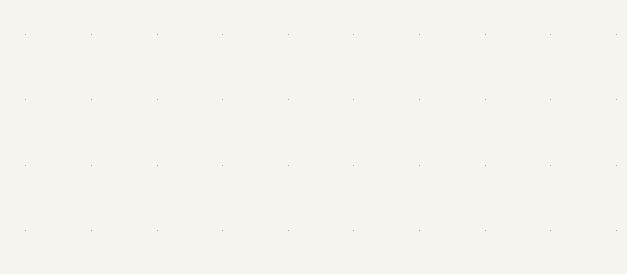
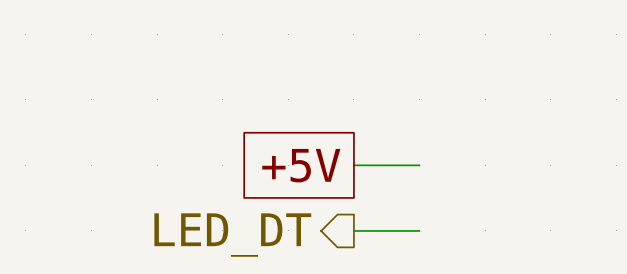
global label: none -> +5V (301, 165)
wire: none -> (353, 165) (419, 165)
wire: none -> (353, 230) (419, 230)
hierarchical label: none -> LED_DT (232, 235)

